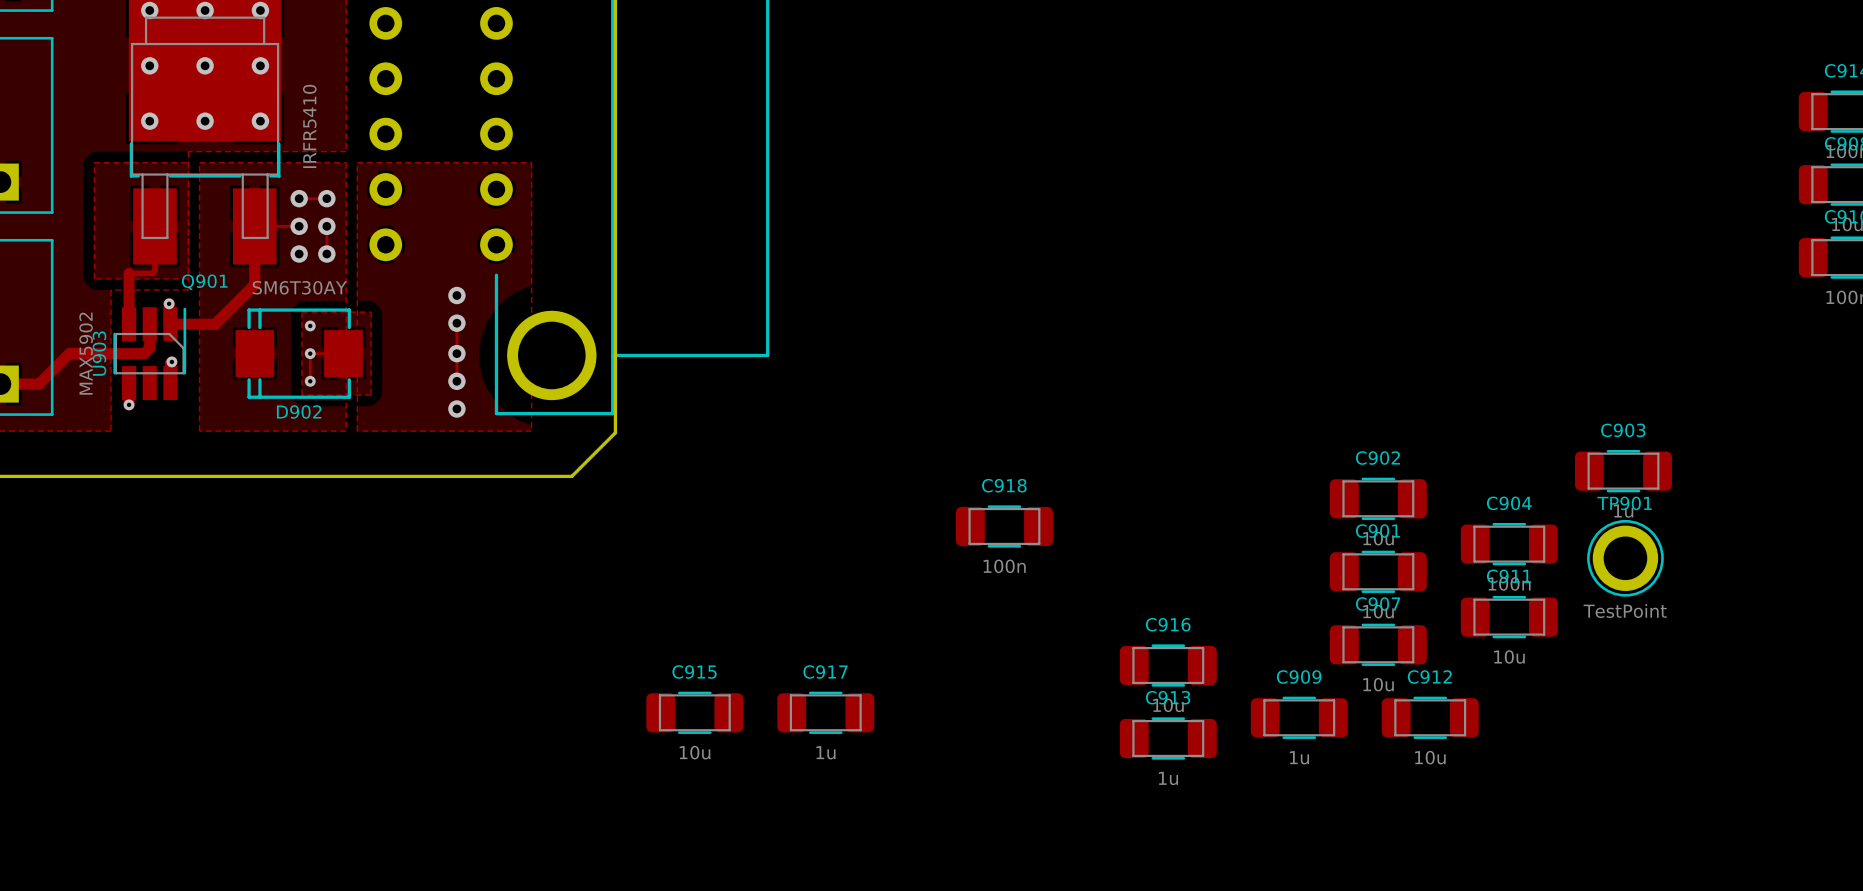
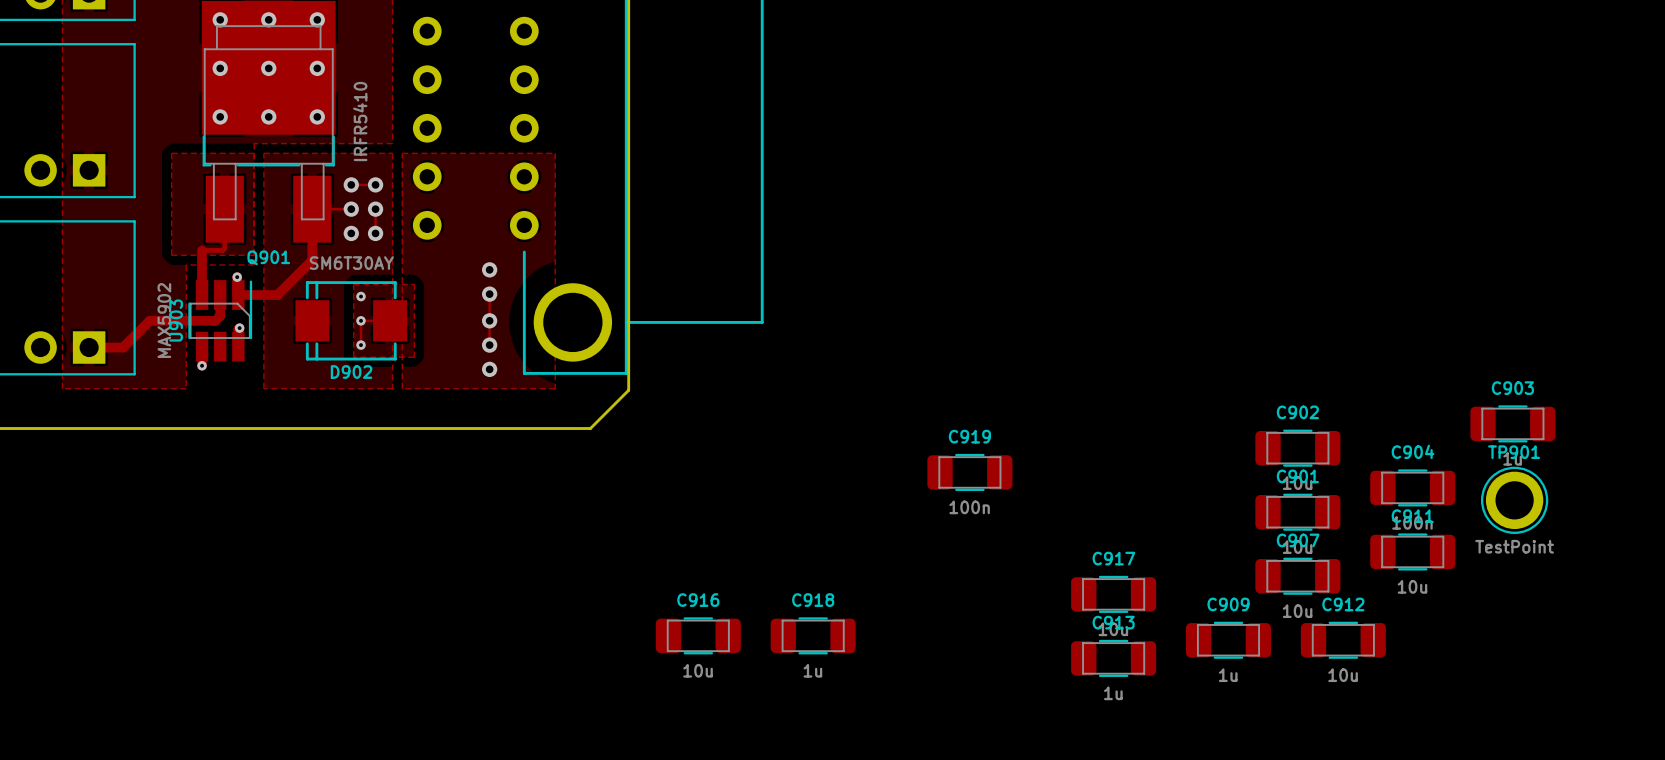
C918 name: C918 (1004, 485) -> C919 (969, 436)
C916 name: C916 (1168, 624) -> C917 (1113, 558)
C915 name: C915 (694, 672) -> C916 (698, 600)
C917 name: C917 (825, 672) -> C918 (813, 600)

